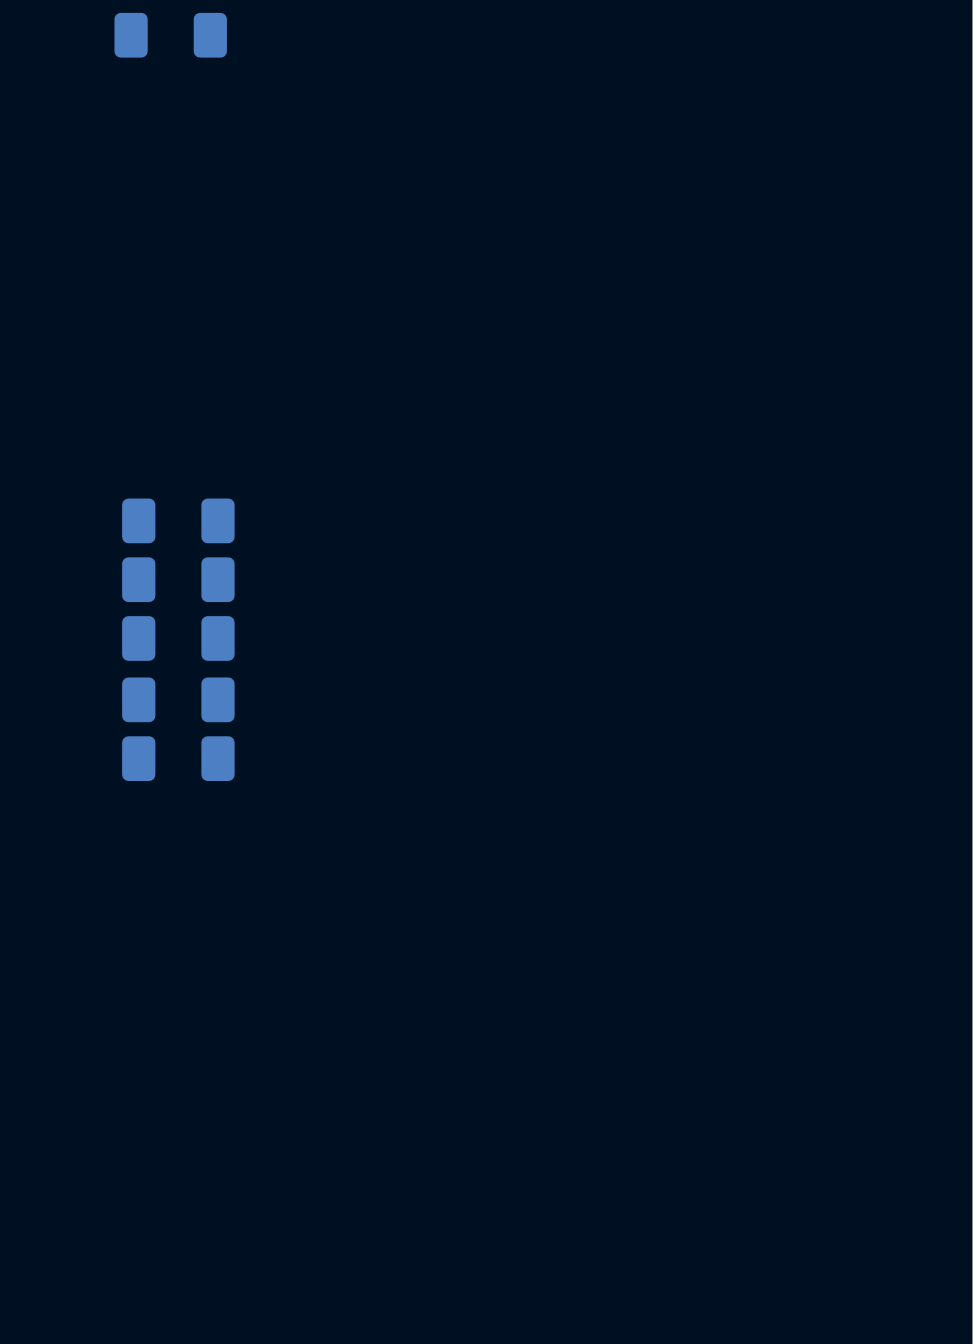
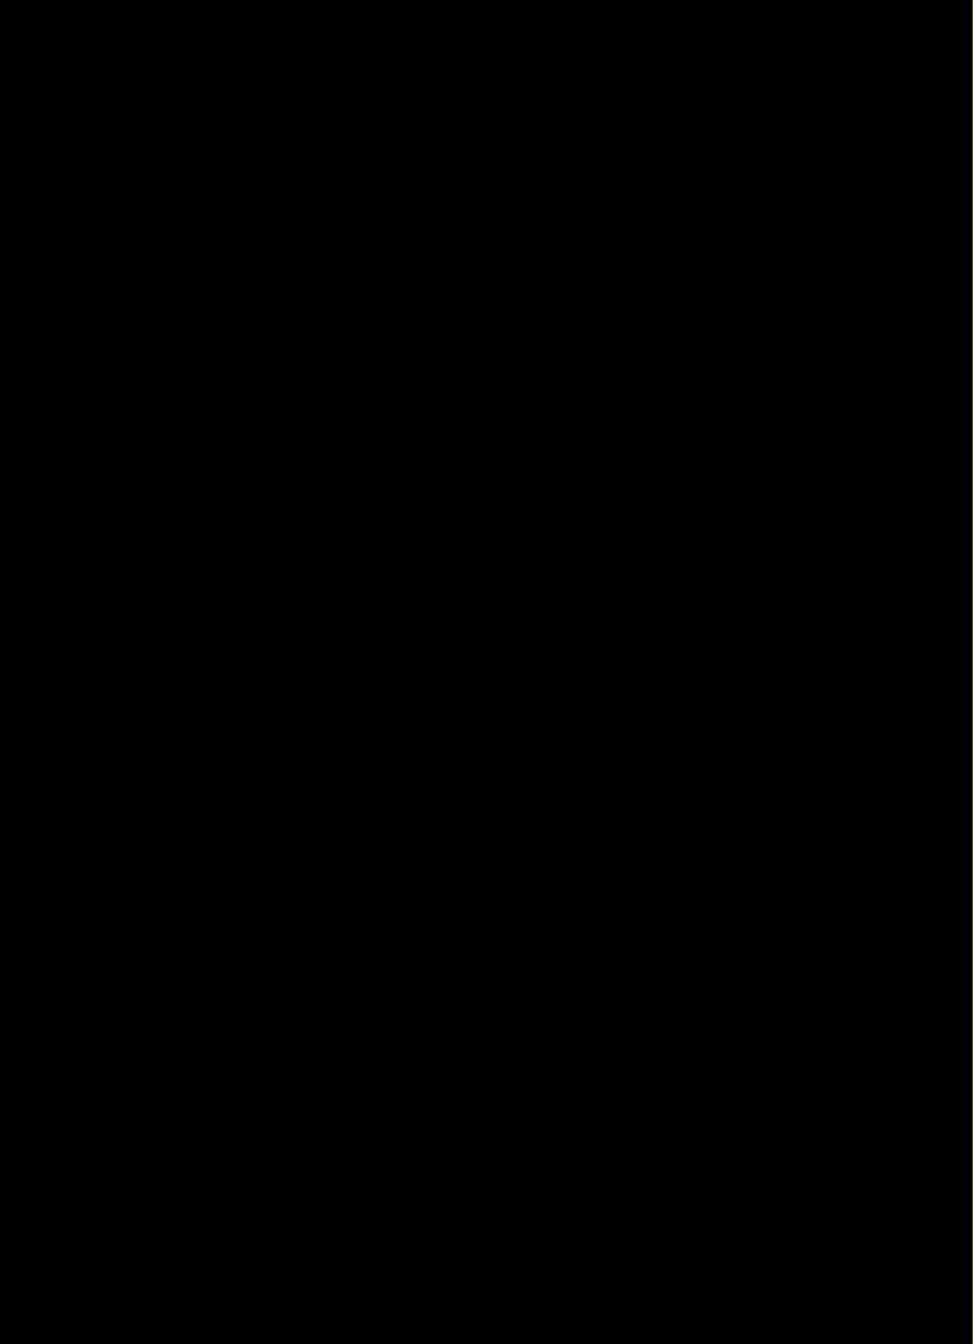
part: (170, 35) -> none
part: (178, 520) -> none
part: (178, 579) -> none
part: (178, 638) -> none
part: (178, 699) -> none
part: (178, 758) -> none

